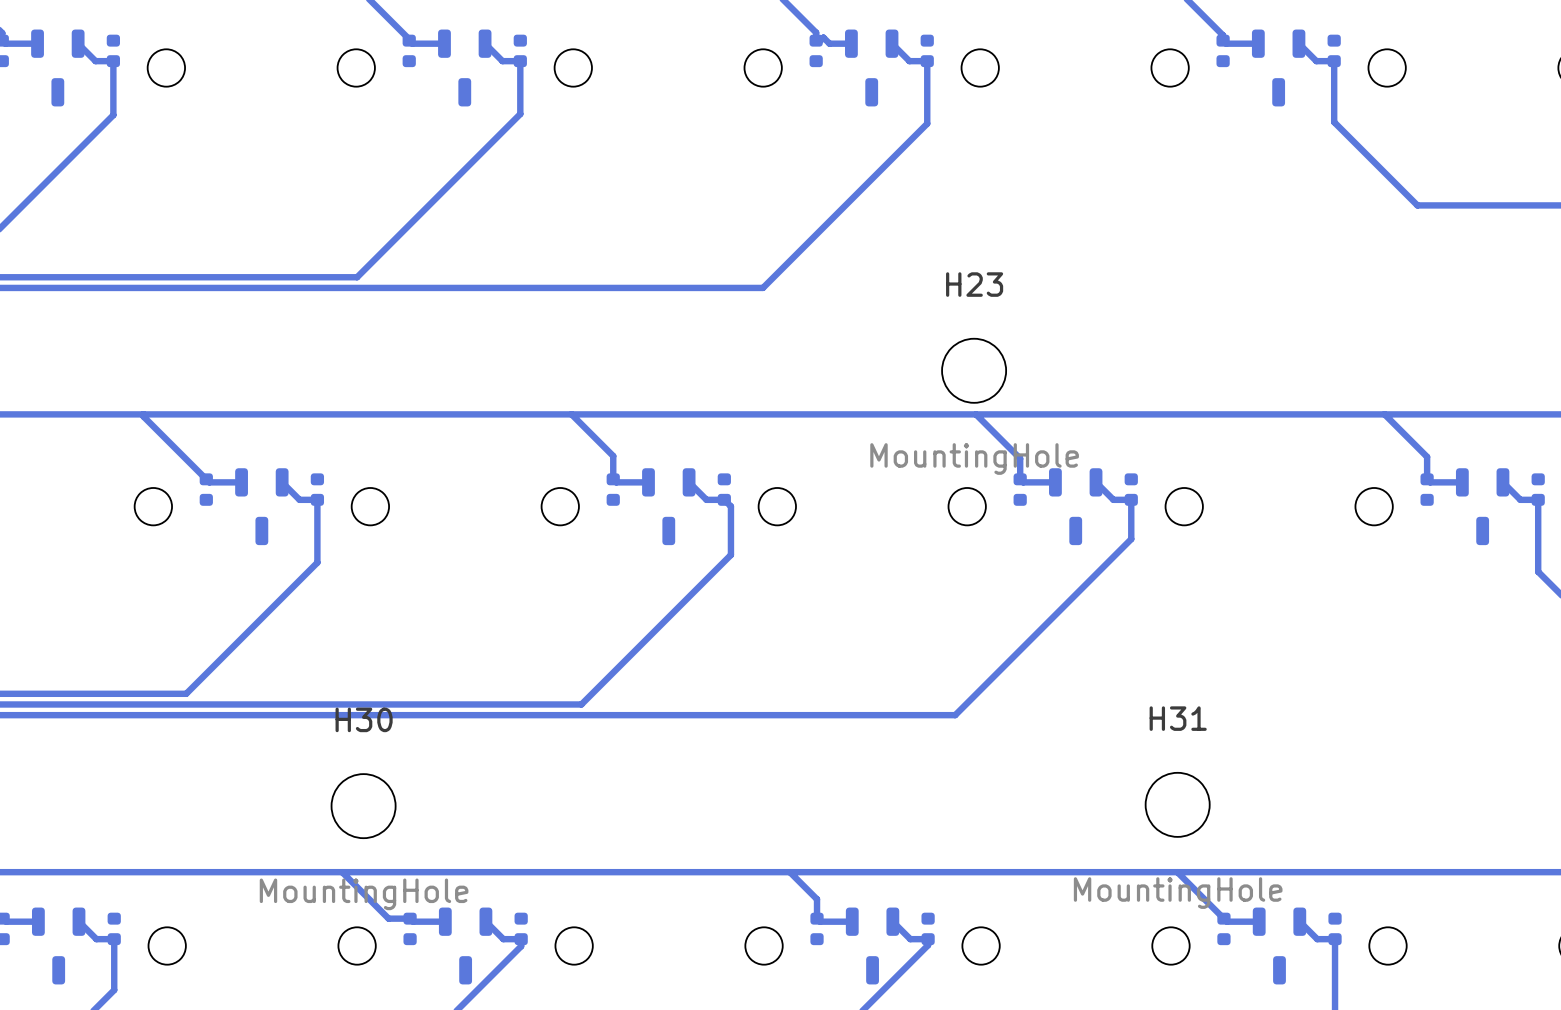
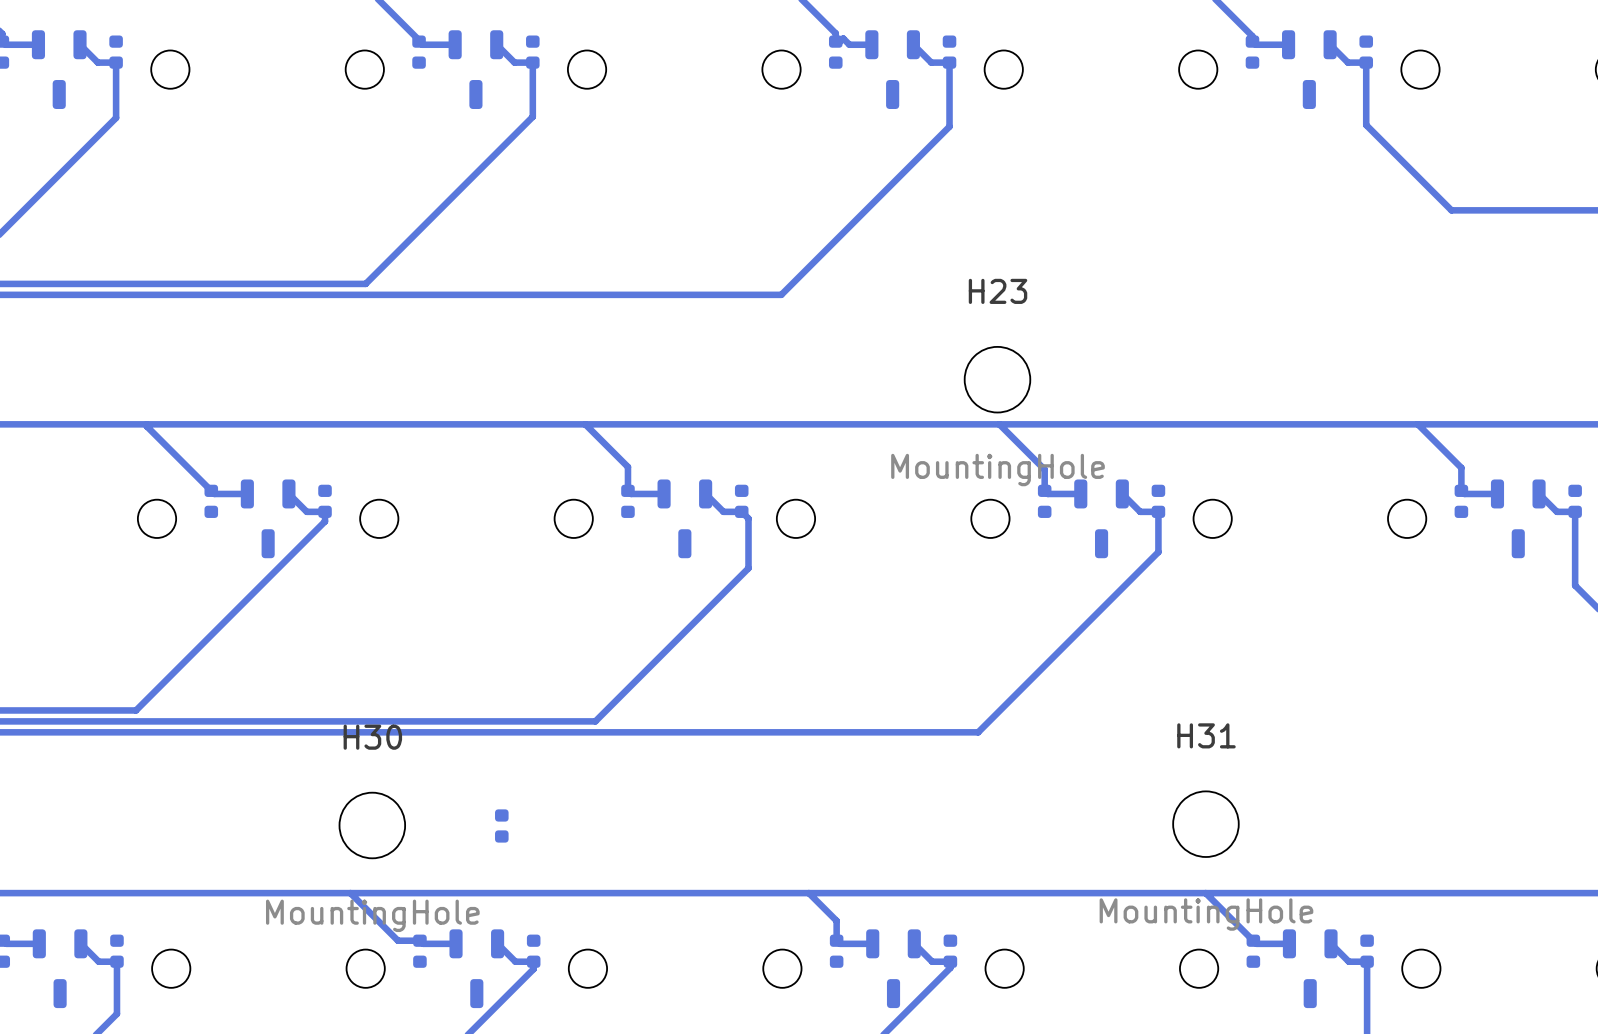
bottom track: (317, 509) (317, 562) (186, 693) (132, 693) -> (325, 521) (136, 710)
part: none -> (501, 825)

